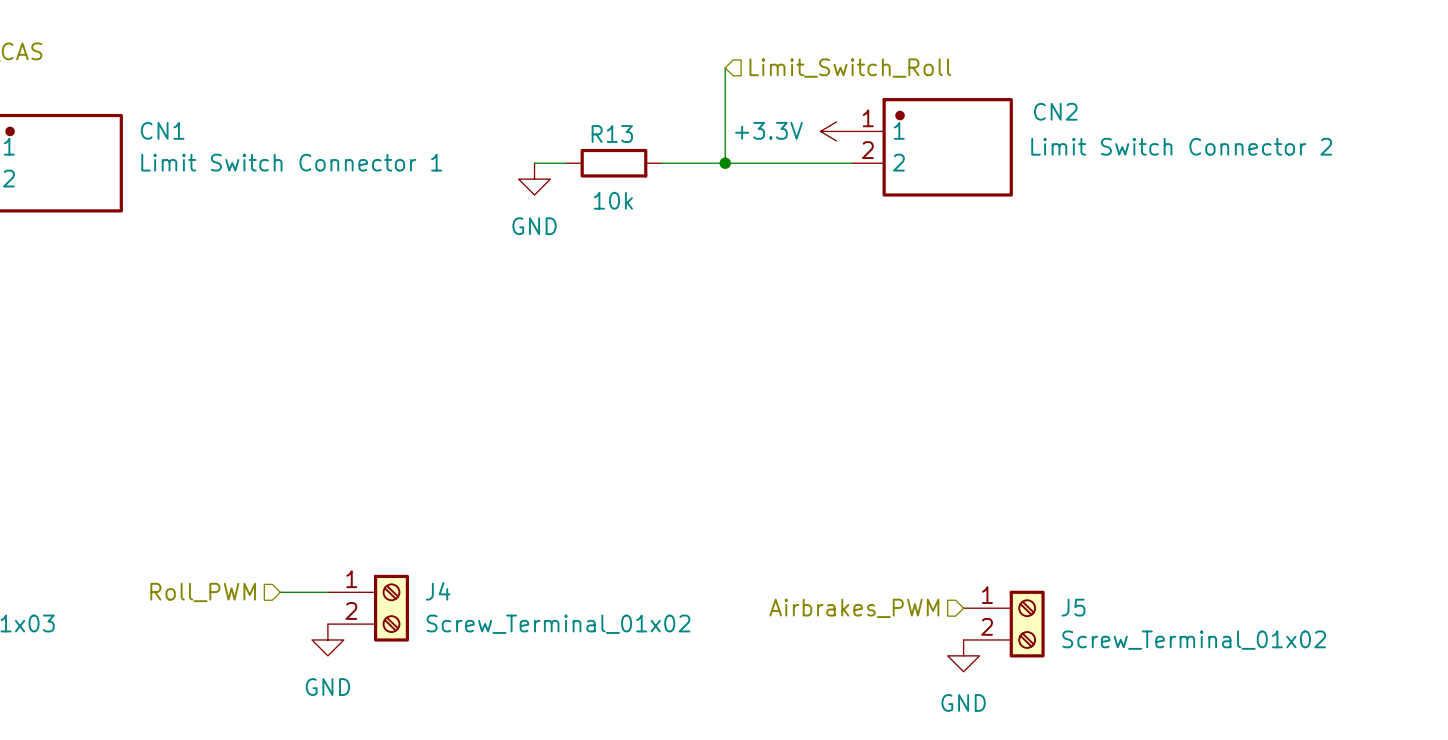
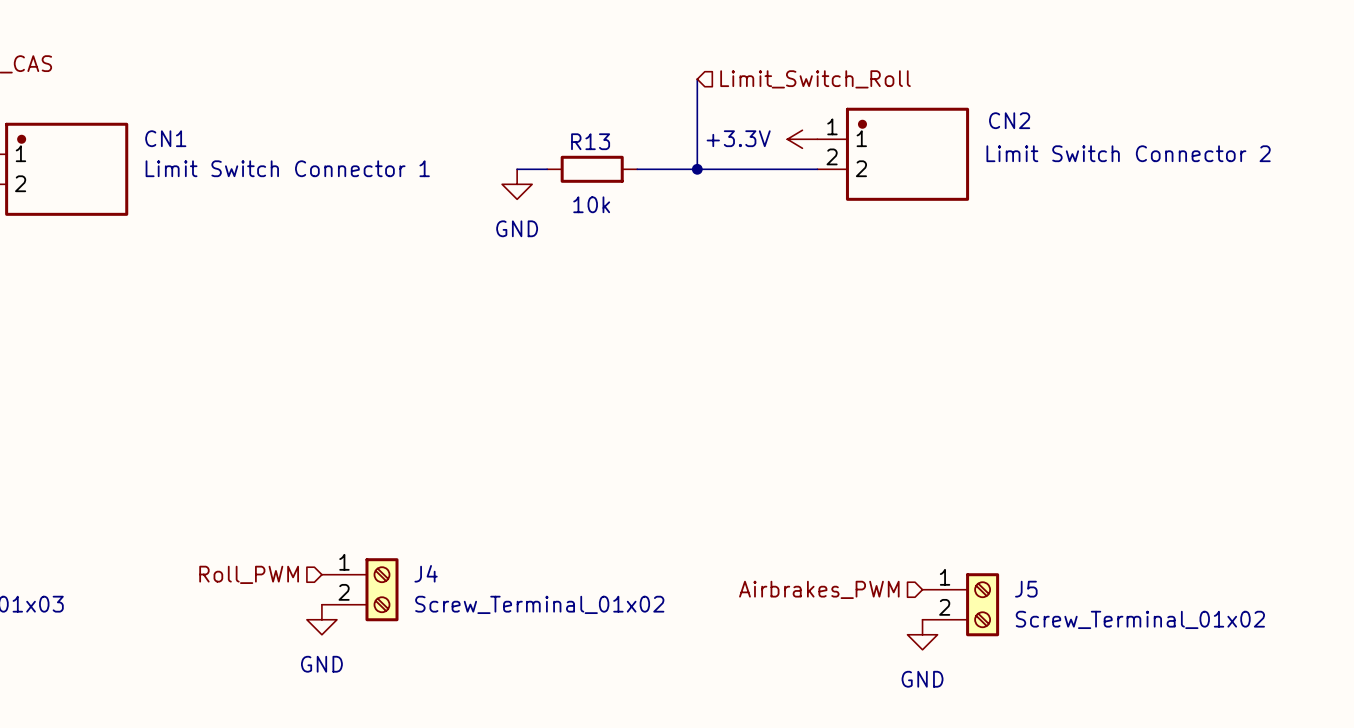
hierarchical label position: Roll_PWM (203, 592) -> Roll_PWM (249, 574)
wire: (280, 592) (327, 592) -> none

